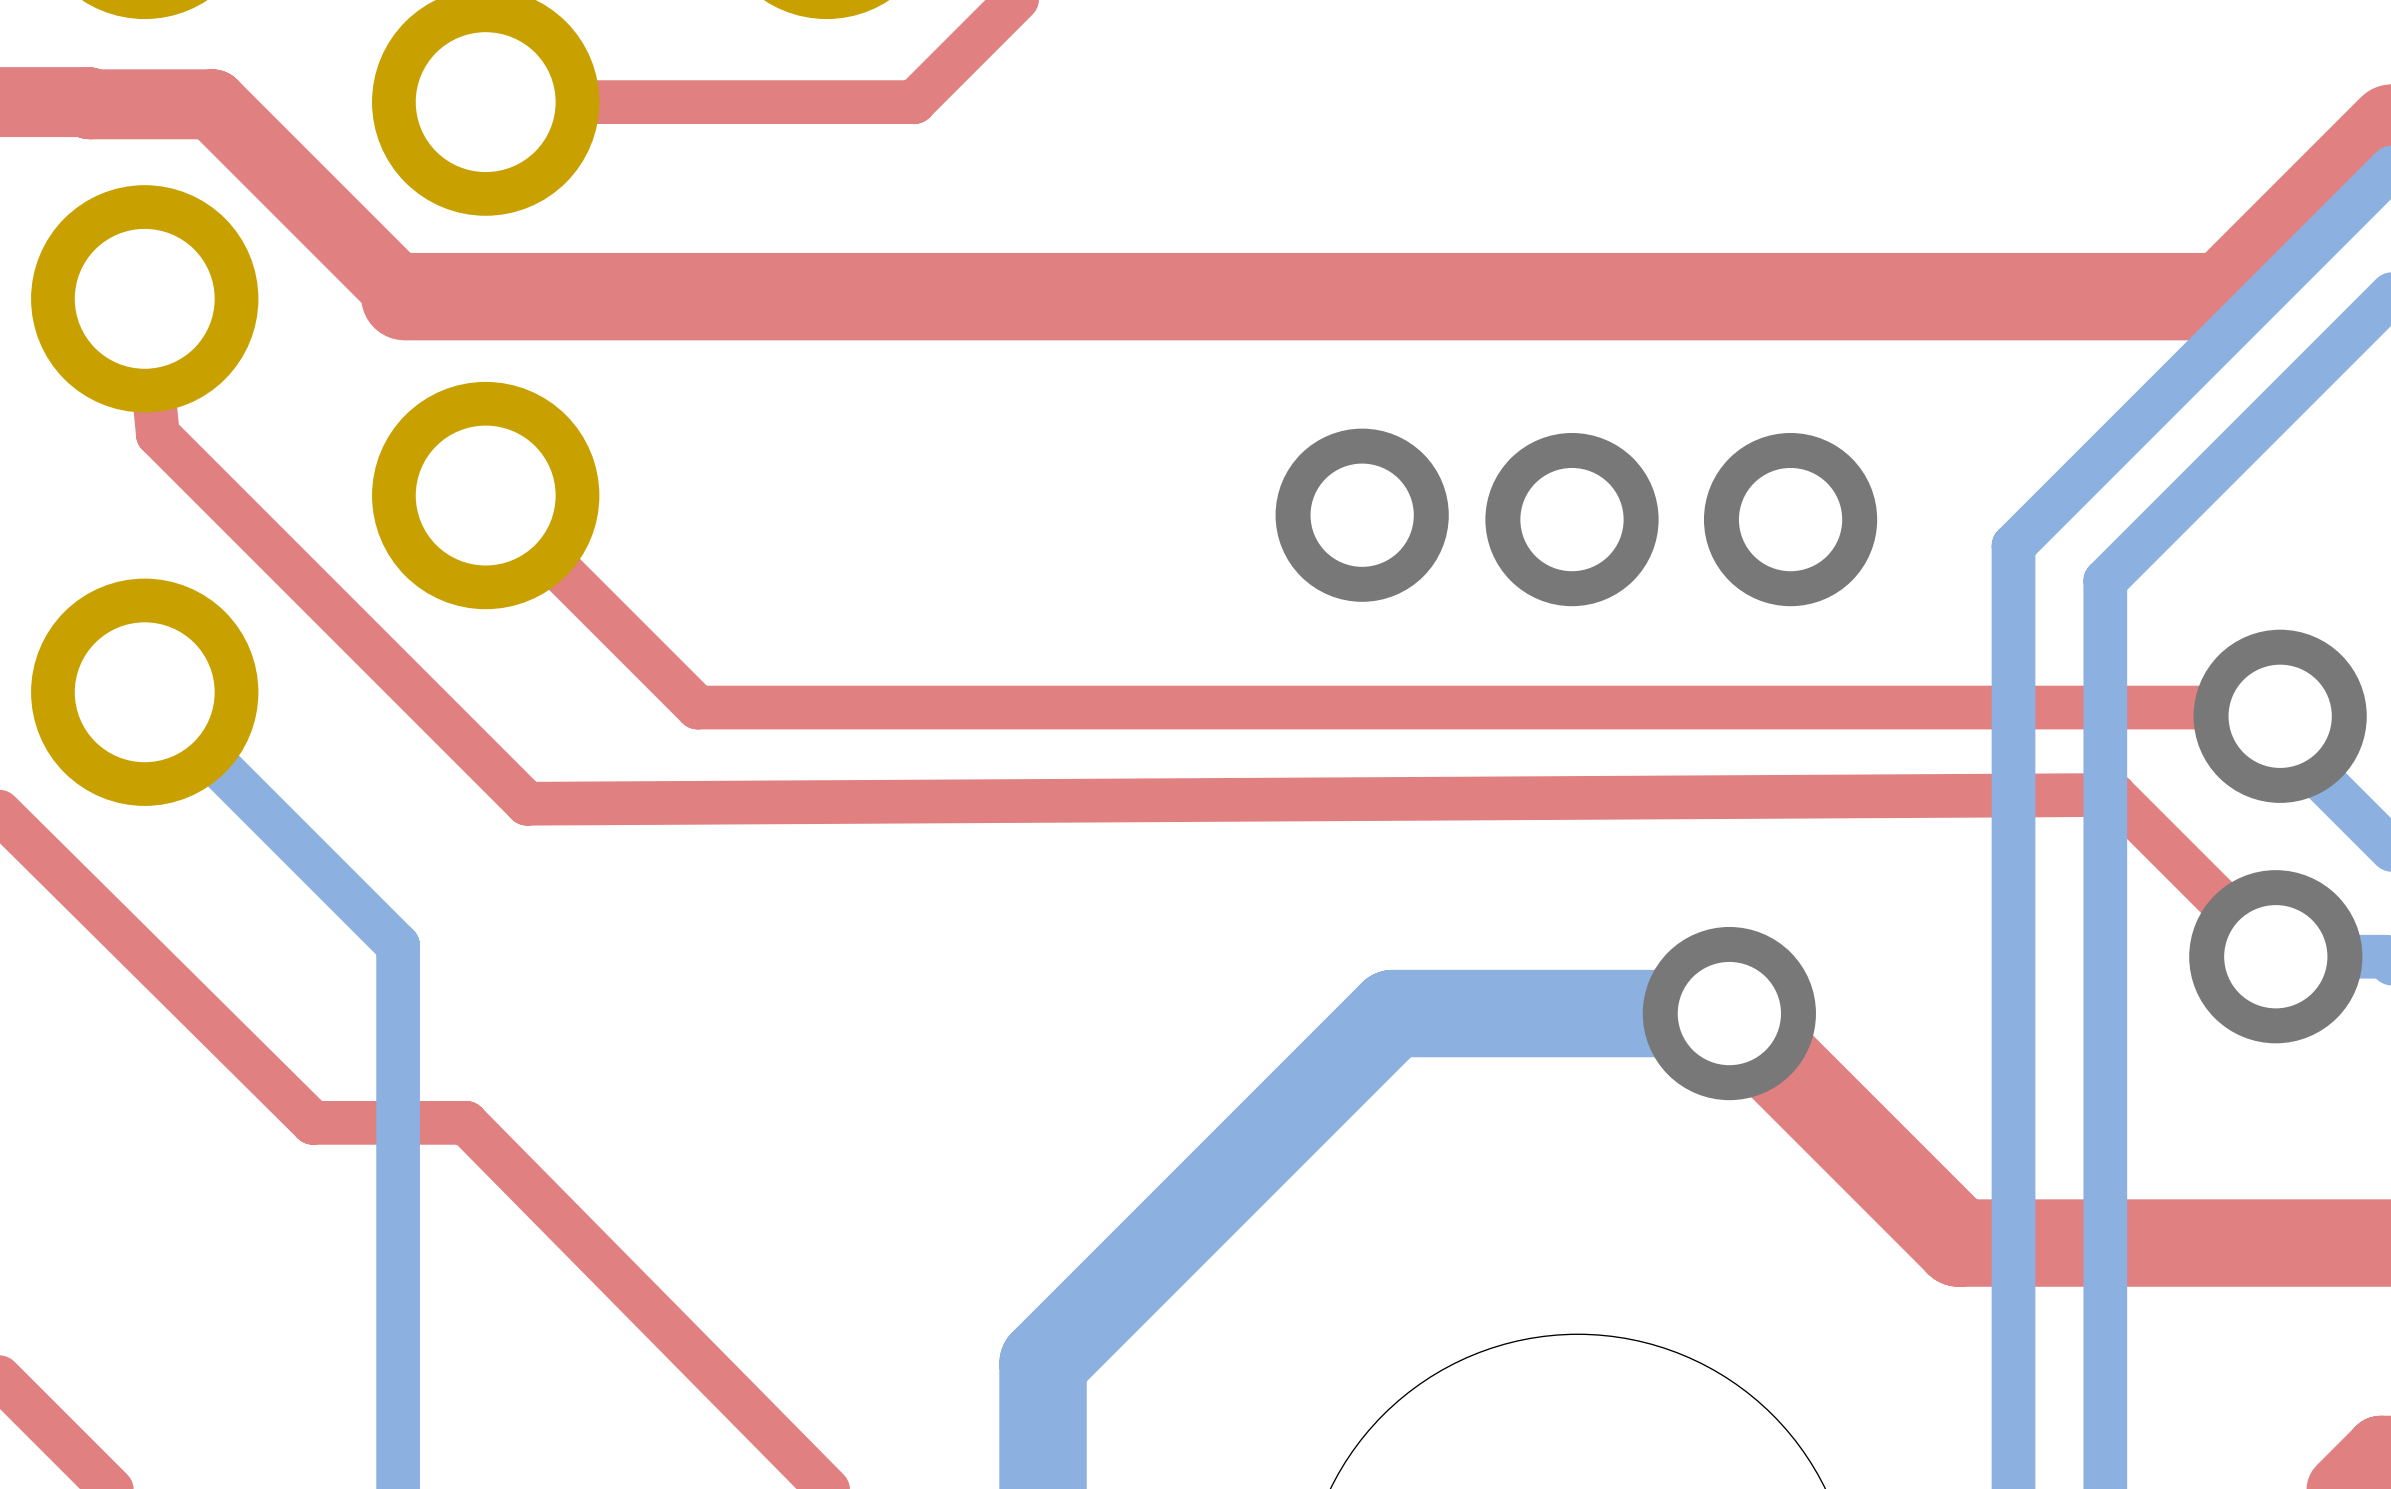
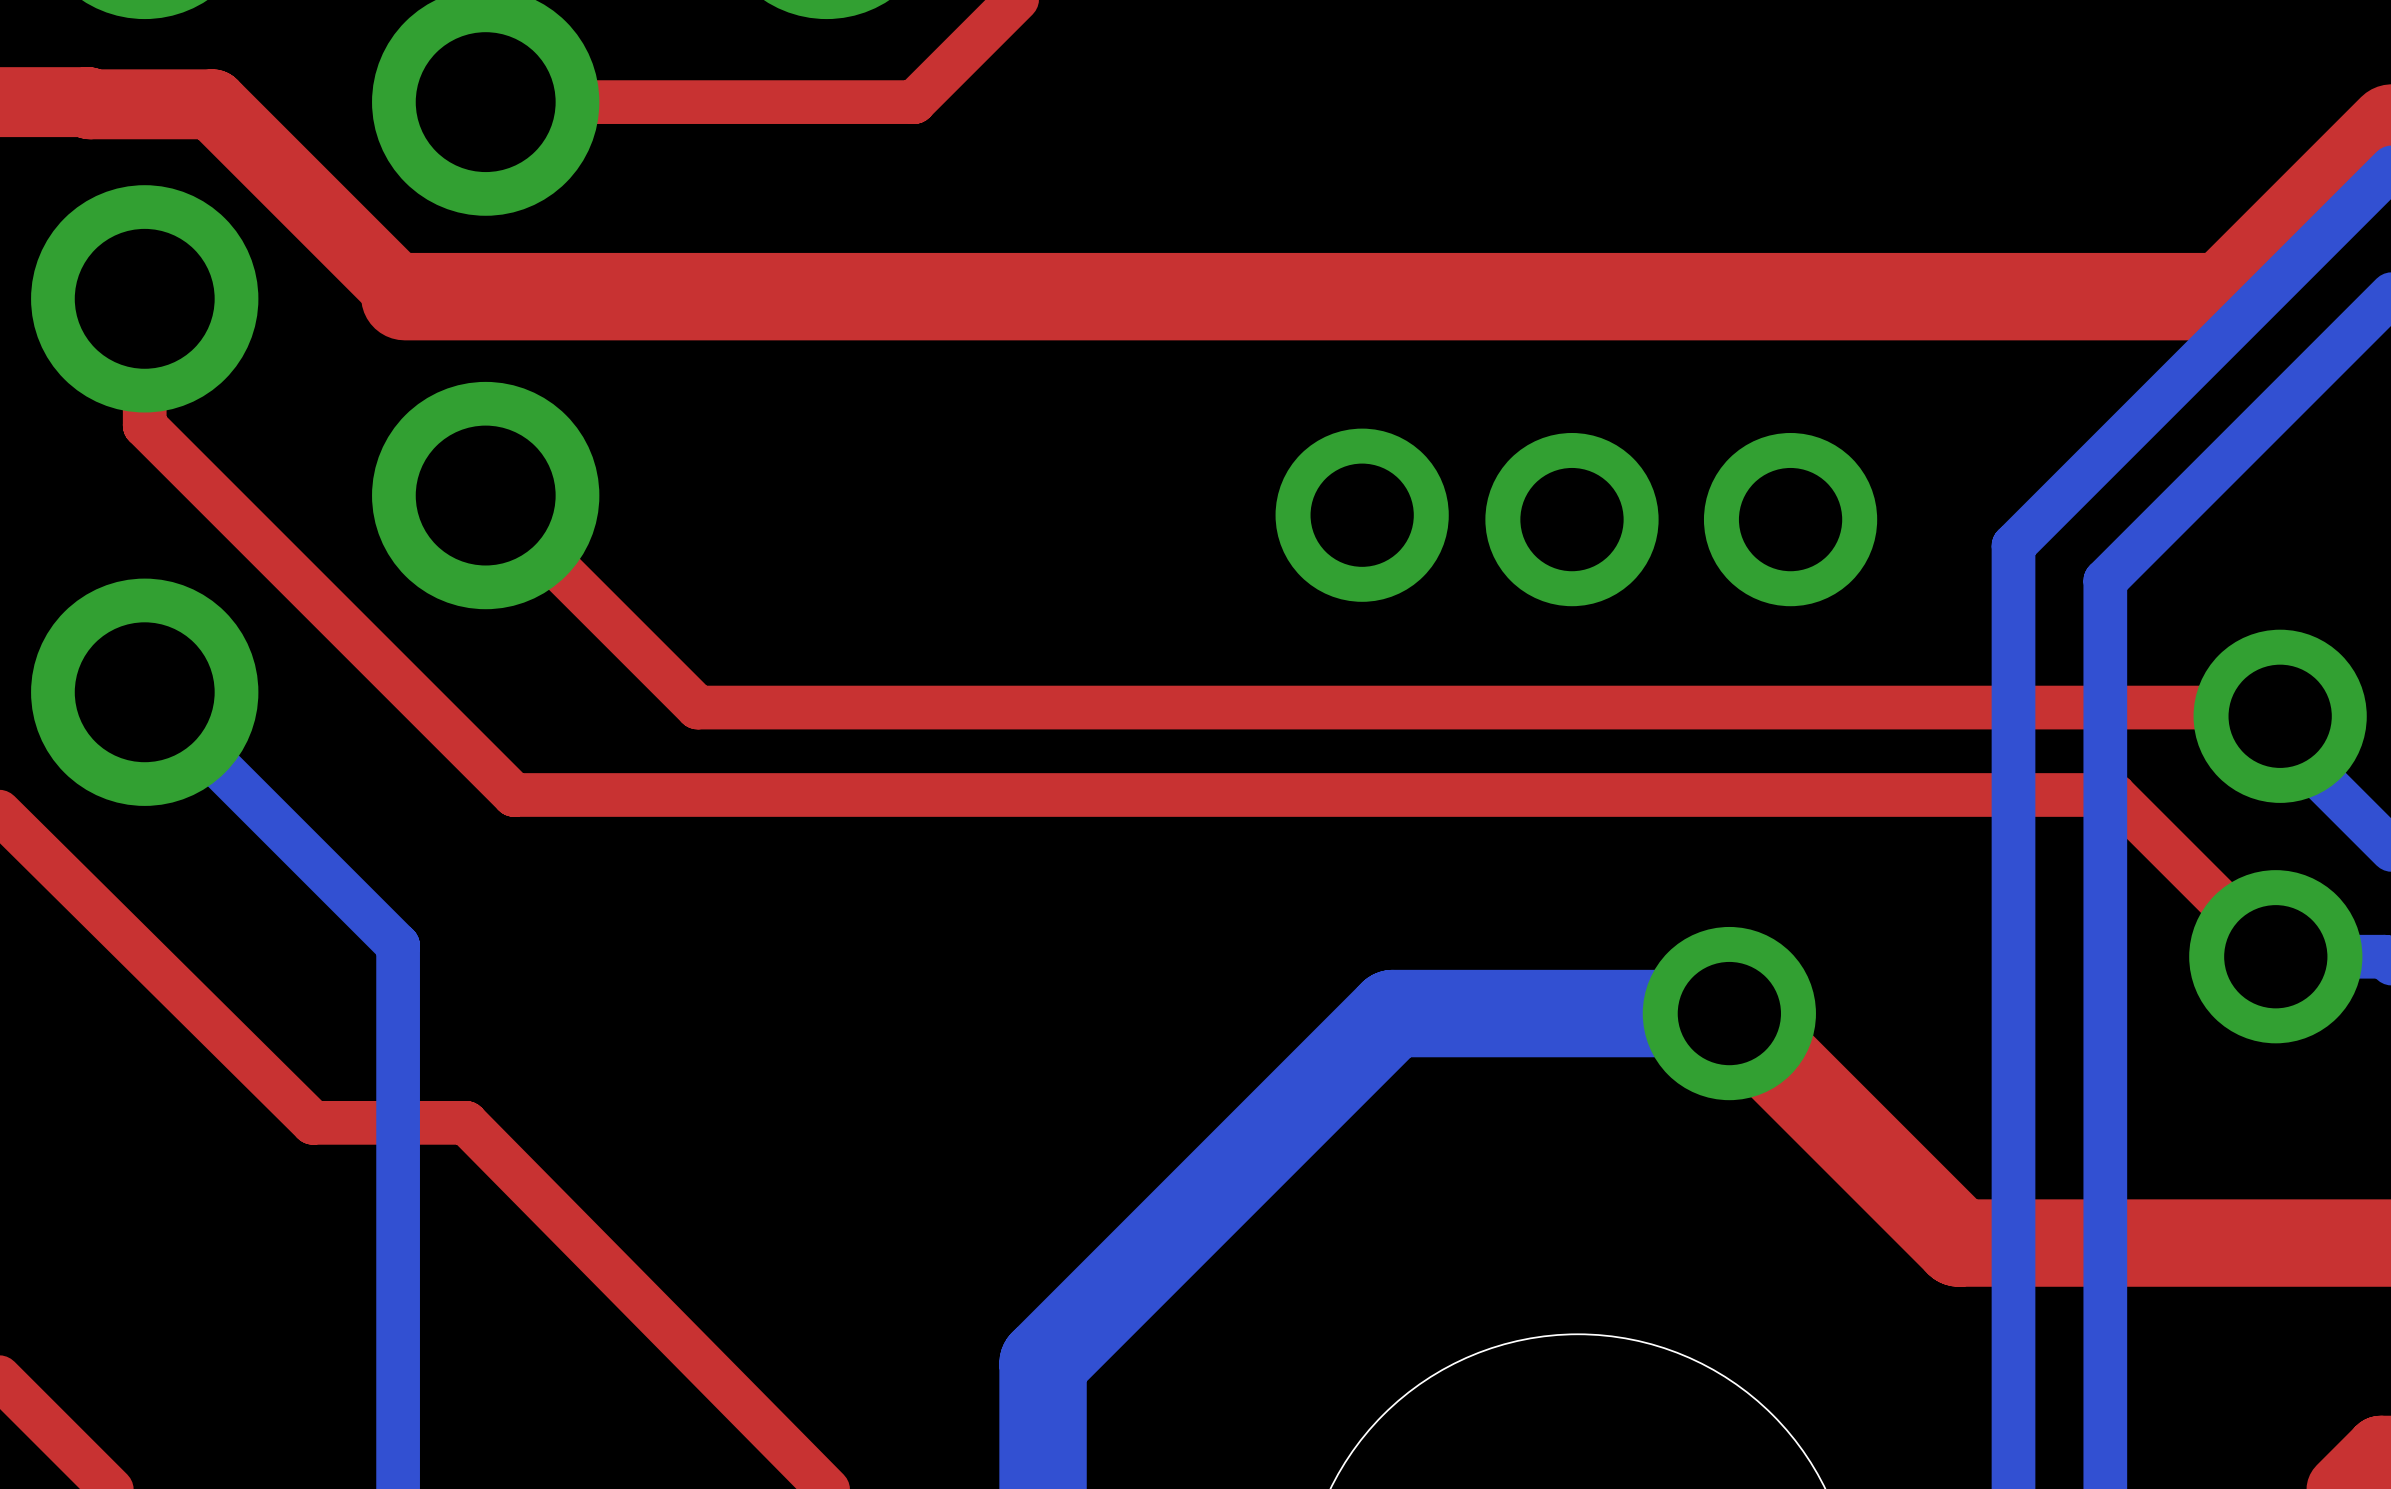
top track: (144, 298) (157, 434) (527, 803) (2114, 794) -> (144, 298) (144, 425) (514, 794) (2114, 794)

